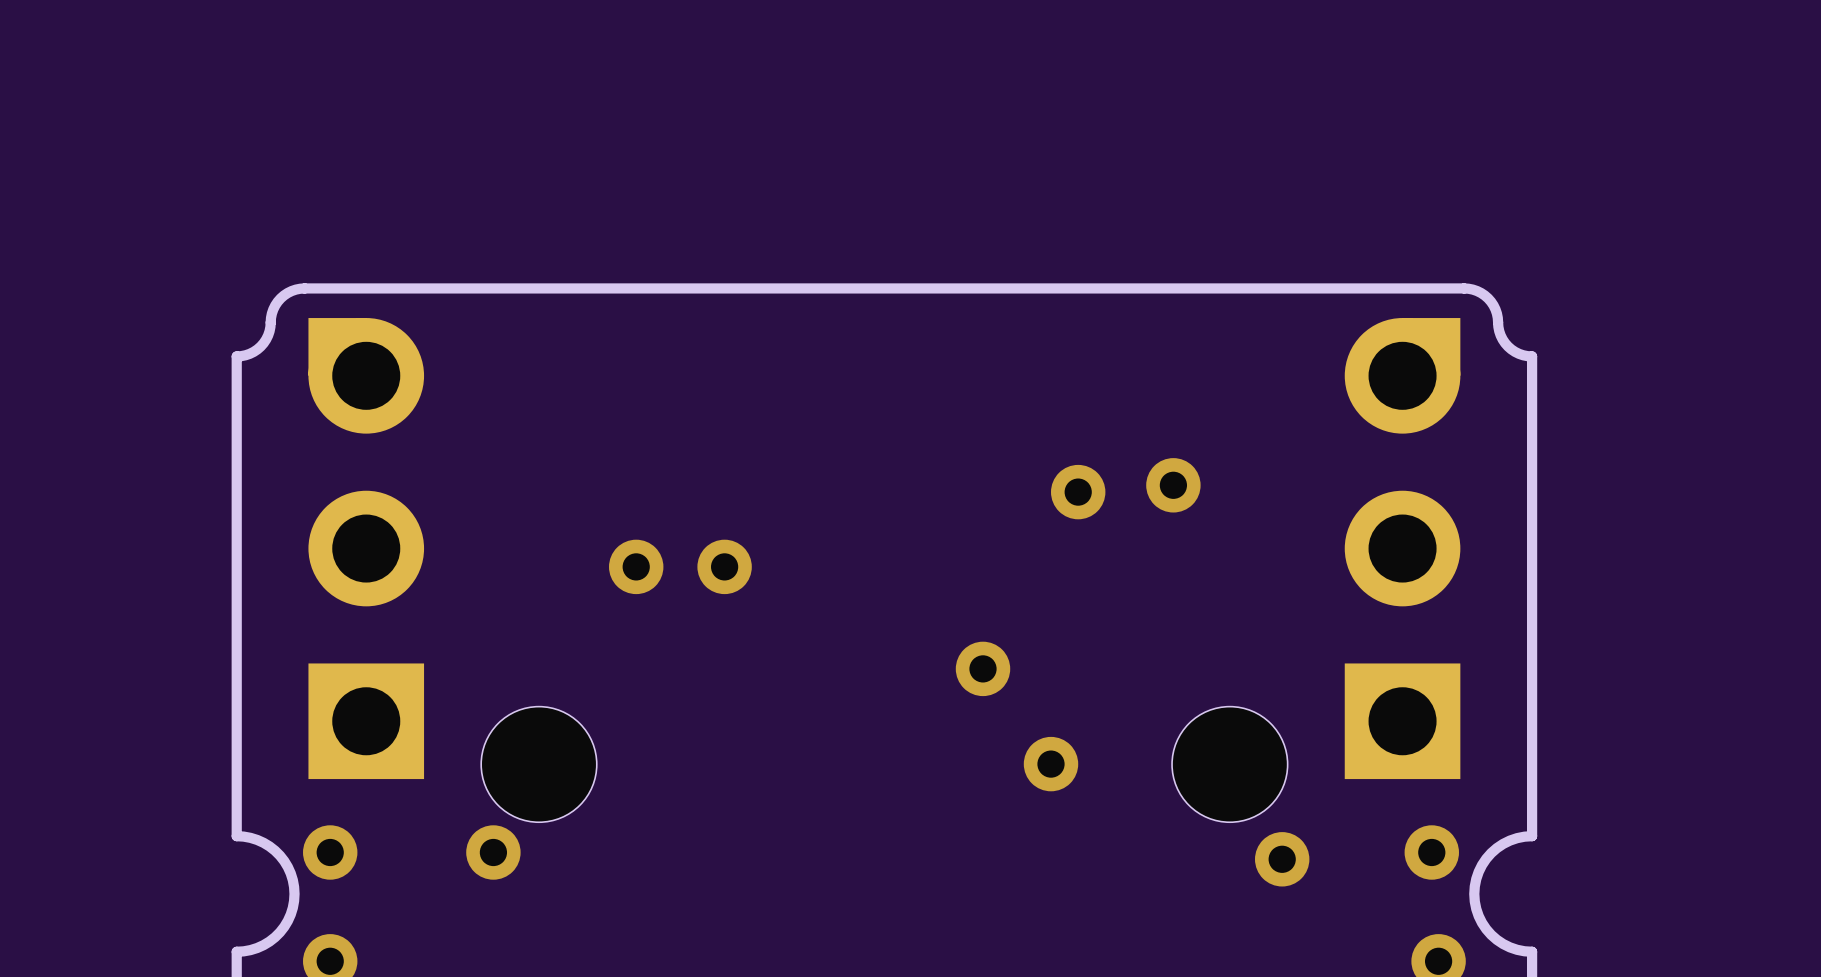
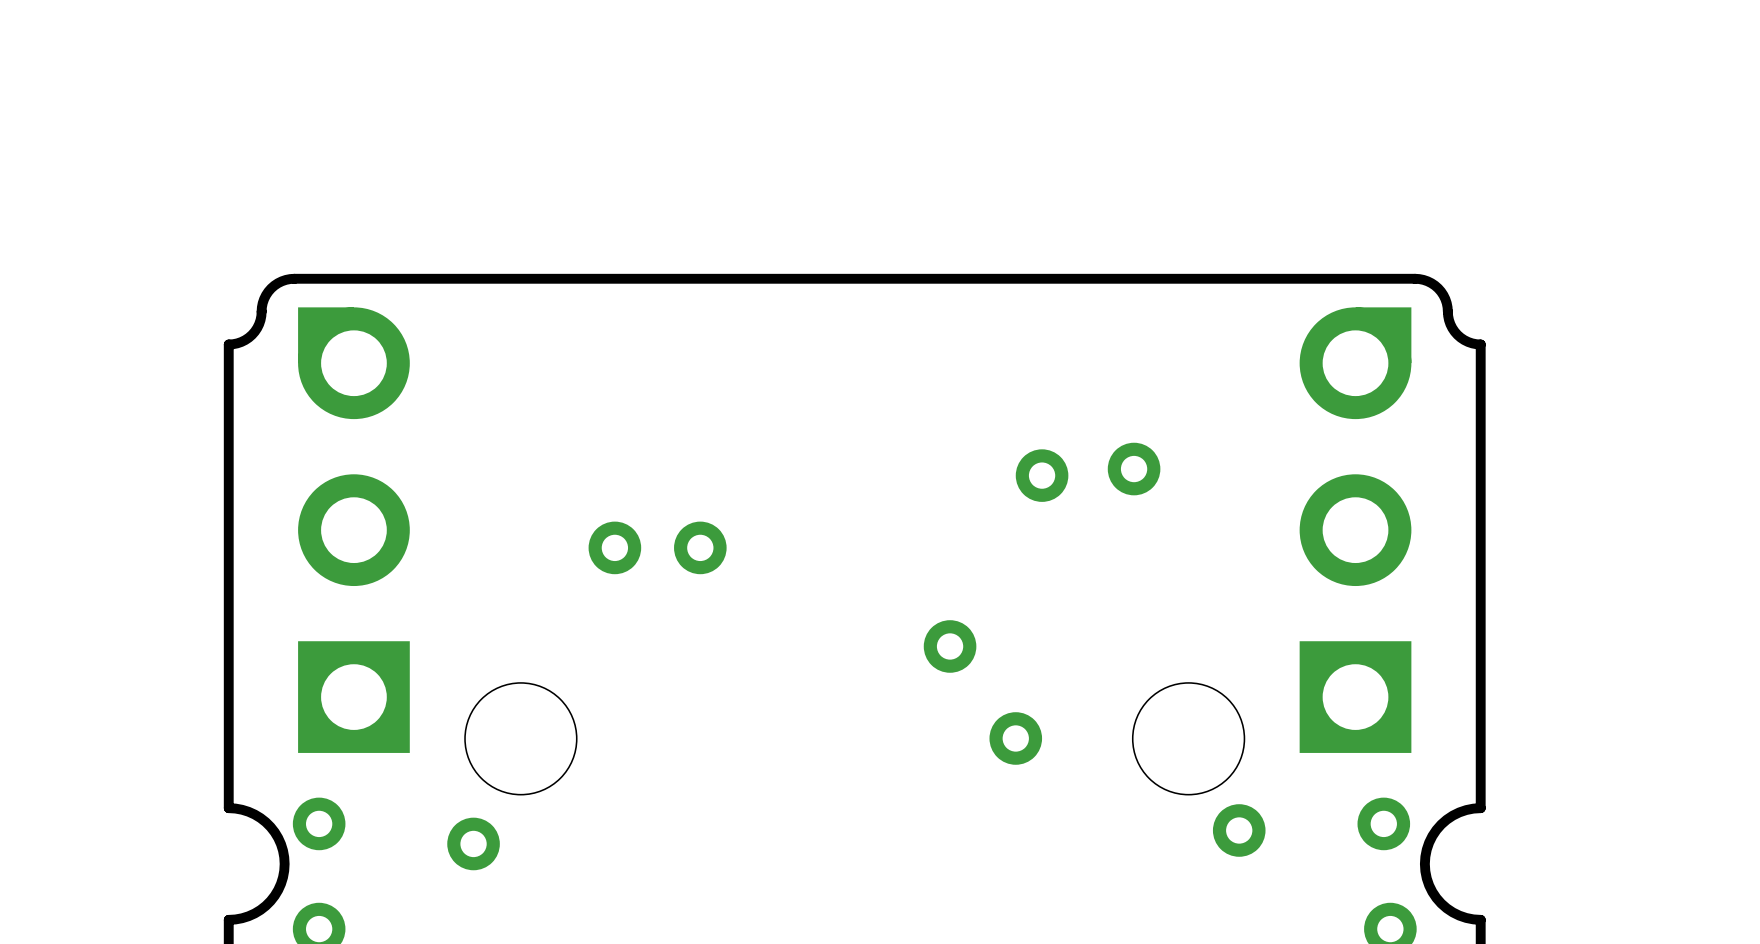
via position: (493, 852) -> (473, 843)

